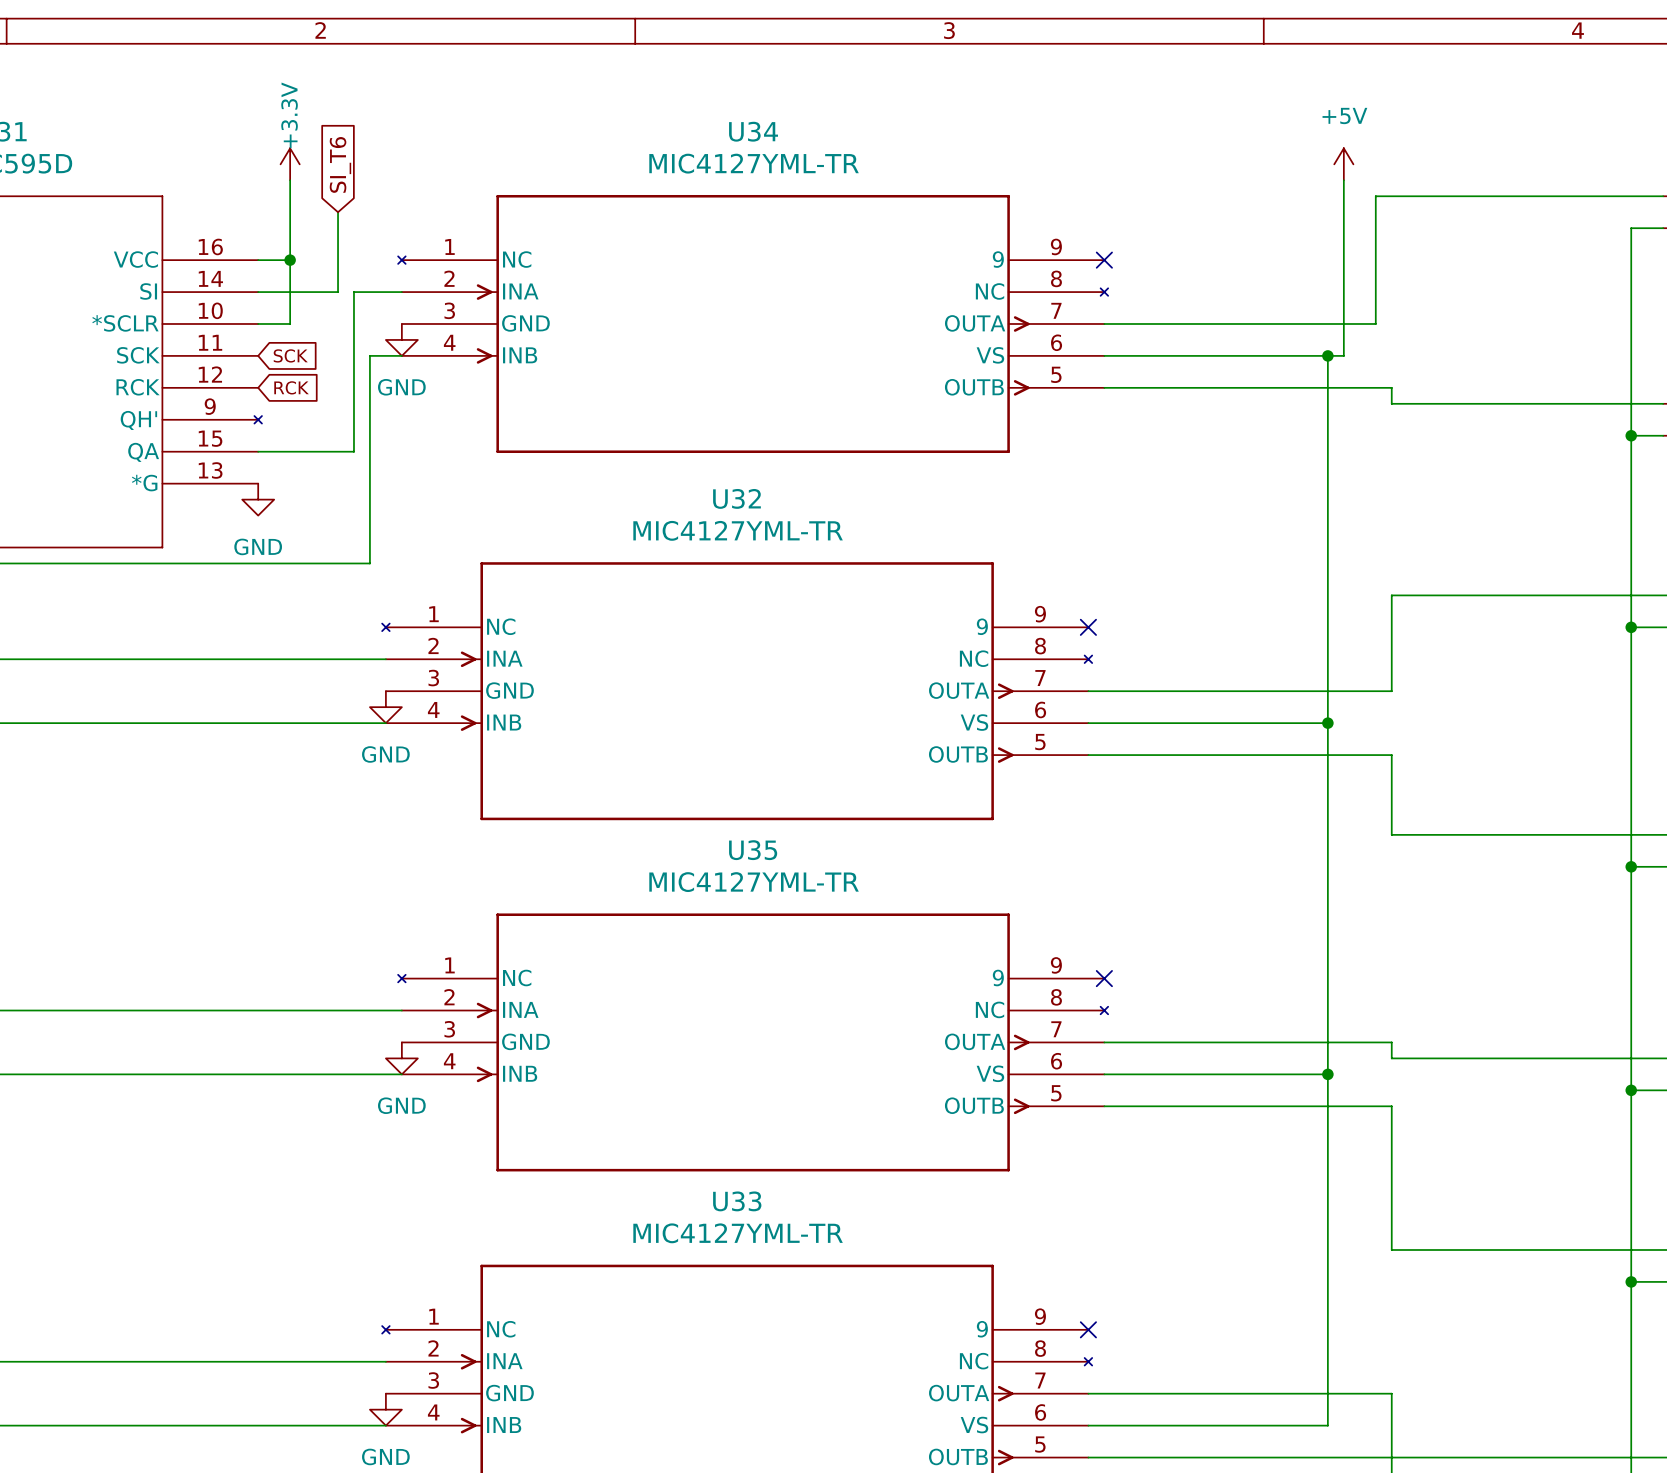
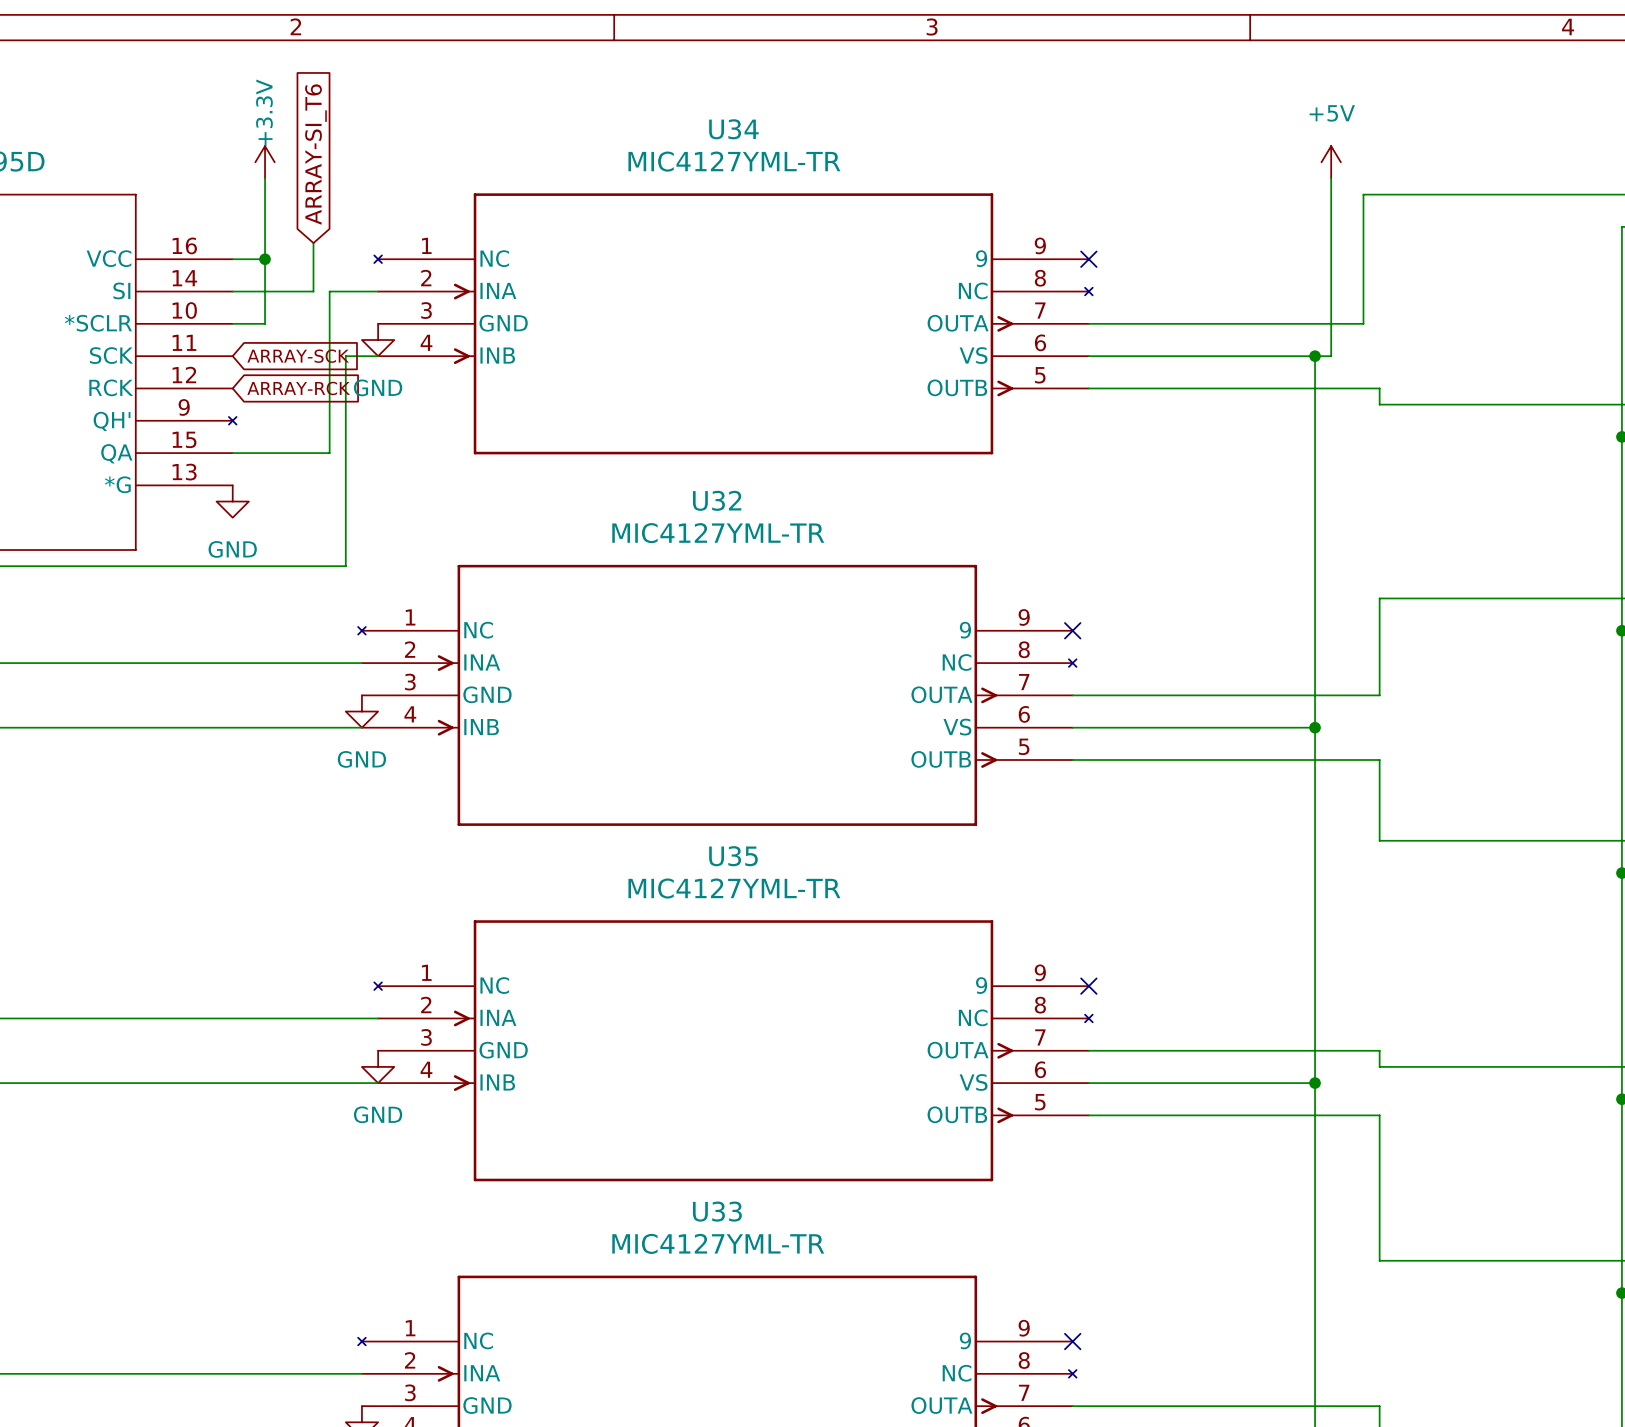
global label: SI_T6 (340, 164) -> ARRAY-SI_T6 (315, 154)
wire: (338, 212) (338, 244) -> none
global label: SCK (290, 355) -> ARRAY-SCK (298, 356)
global label: RCK (291, 387) -> ARRAY-RCK (298, 388)

